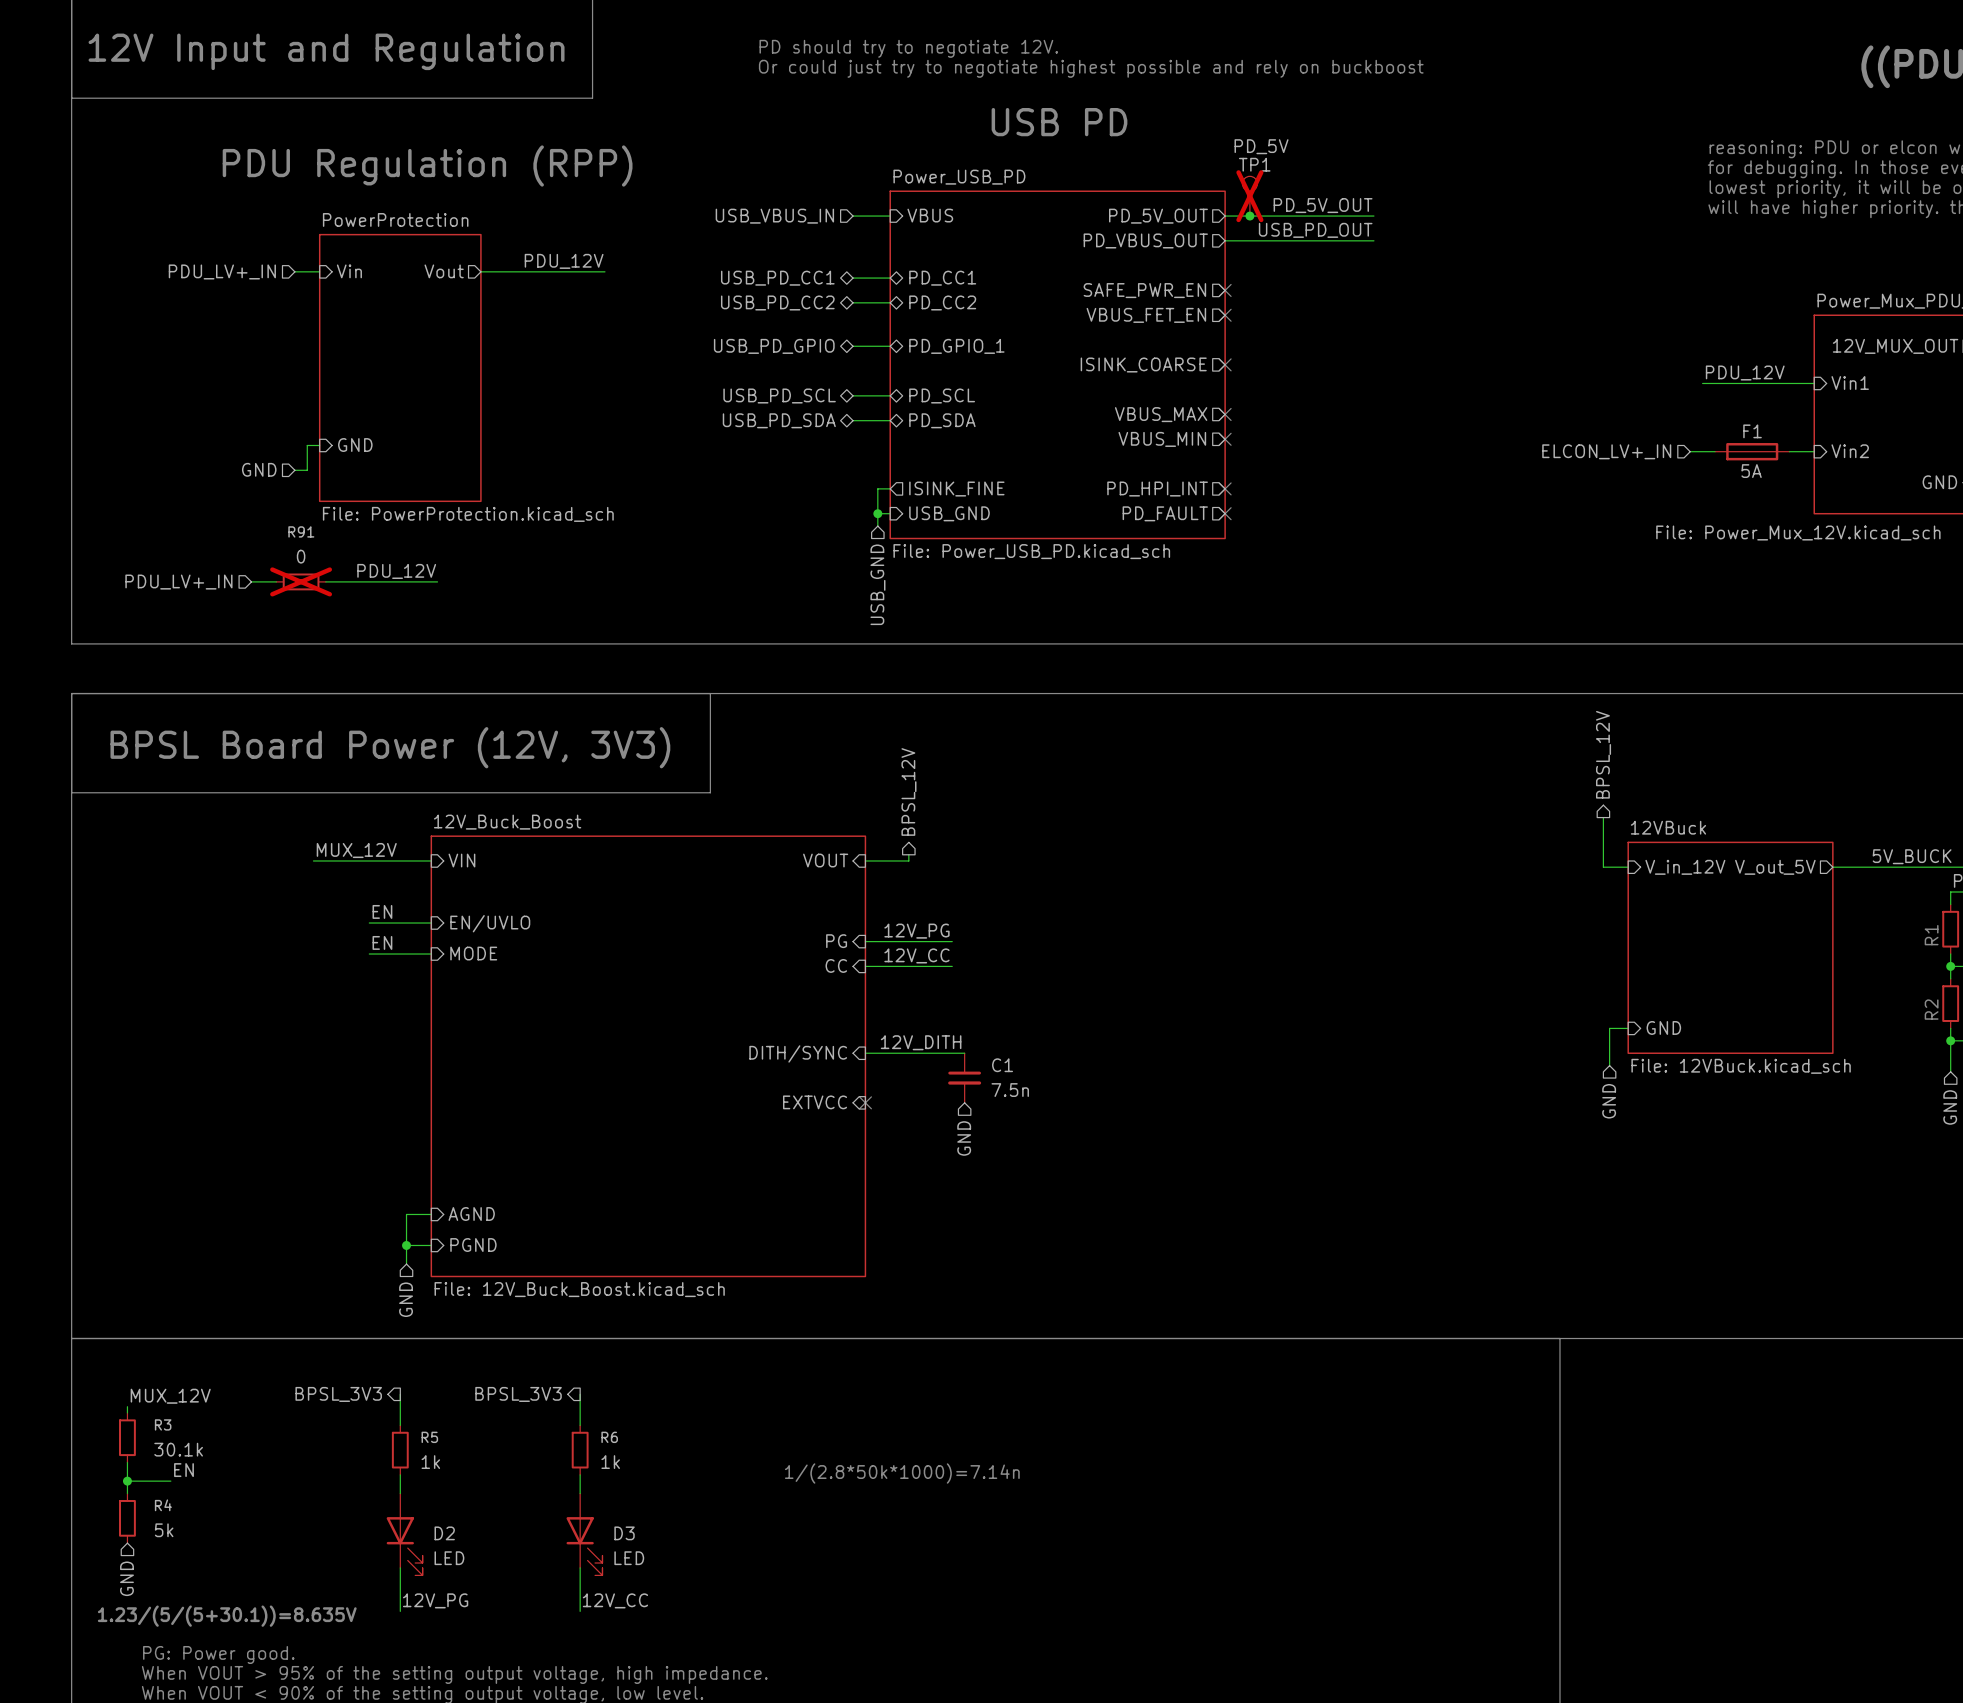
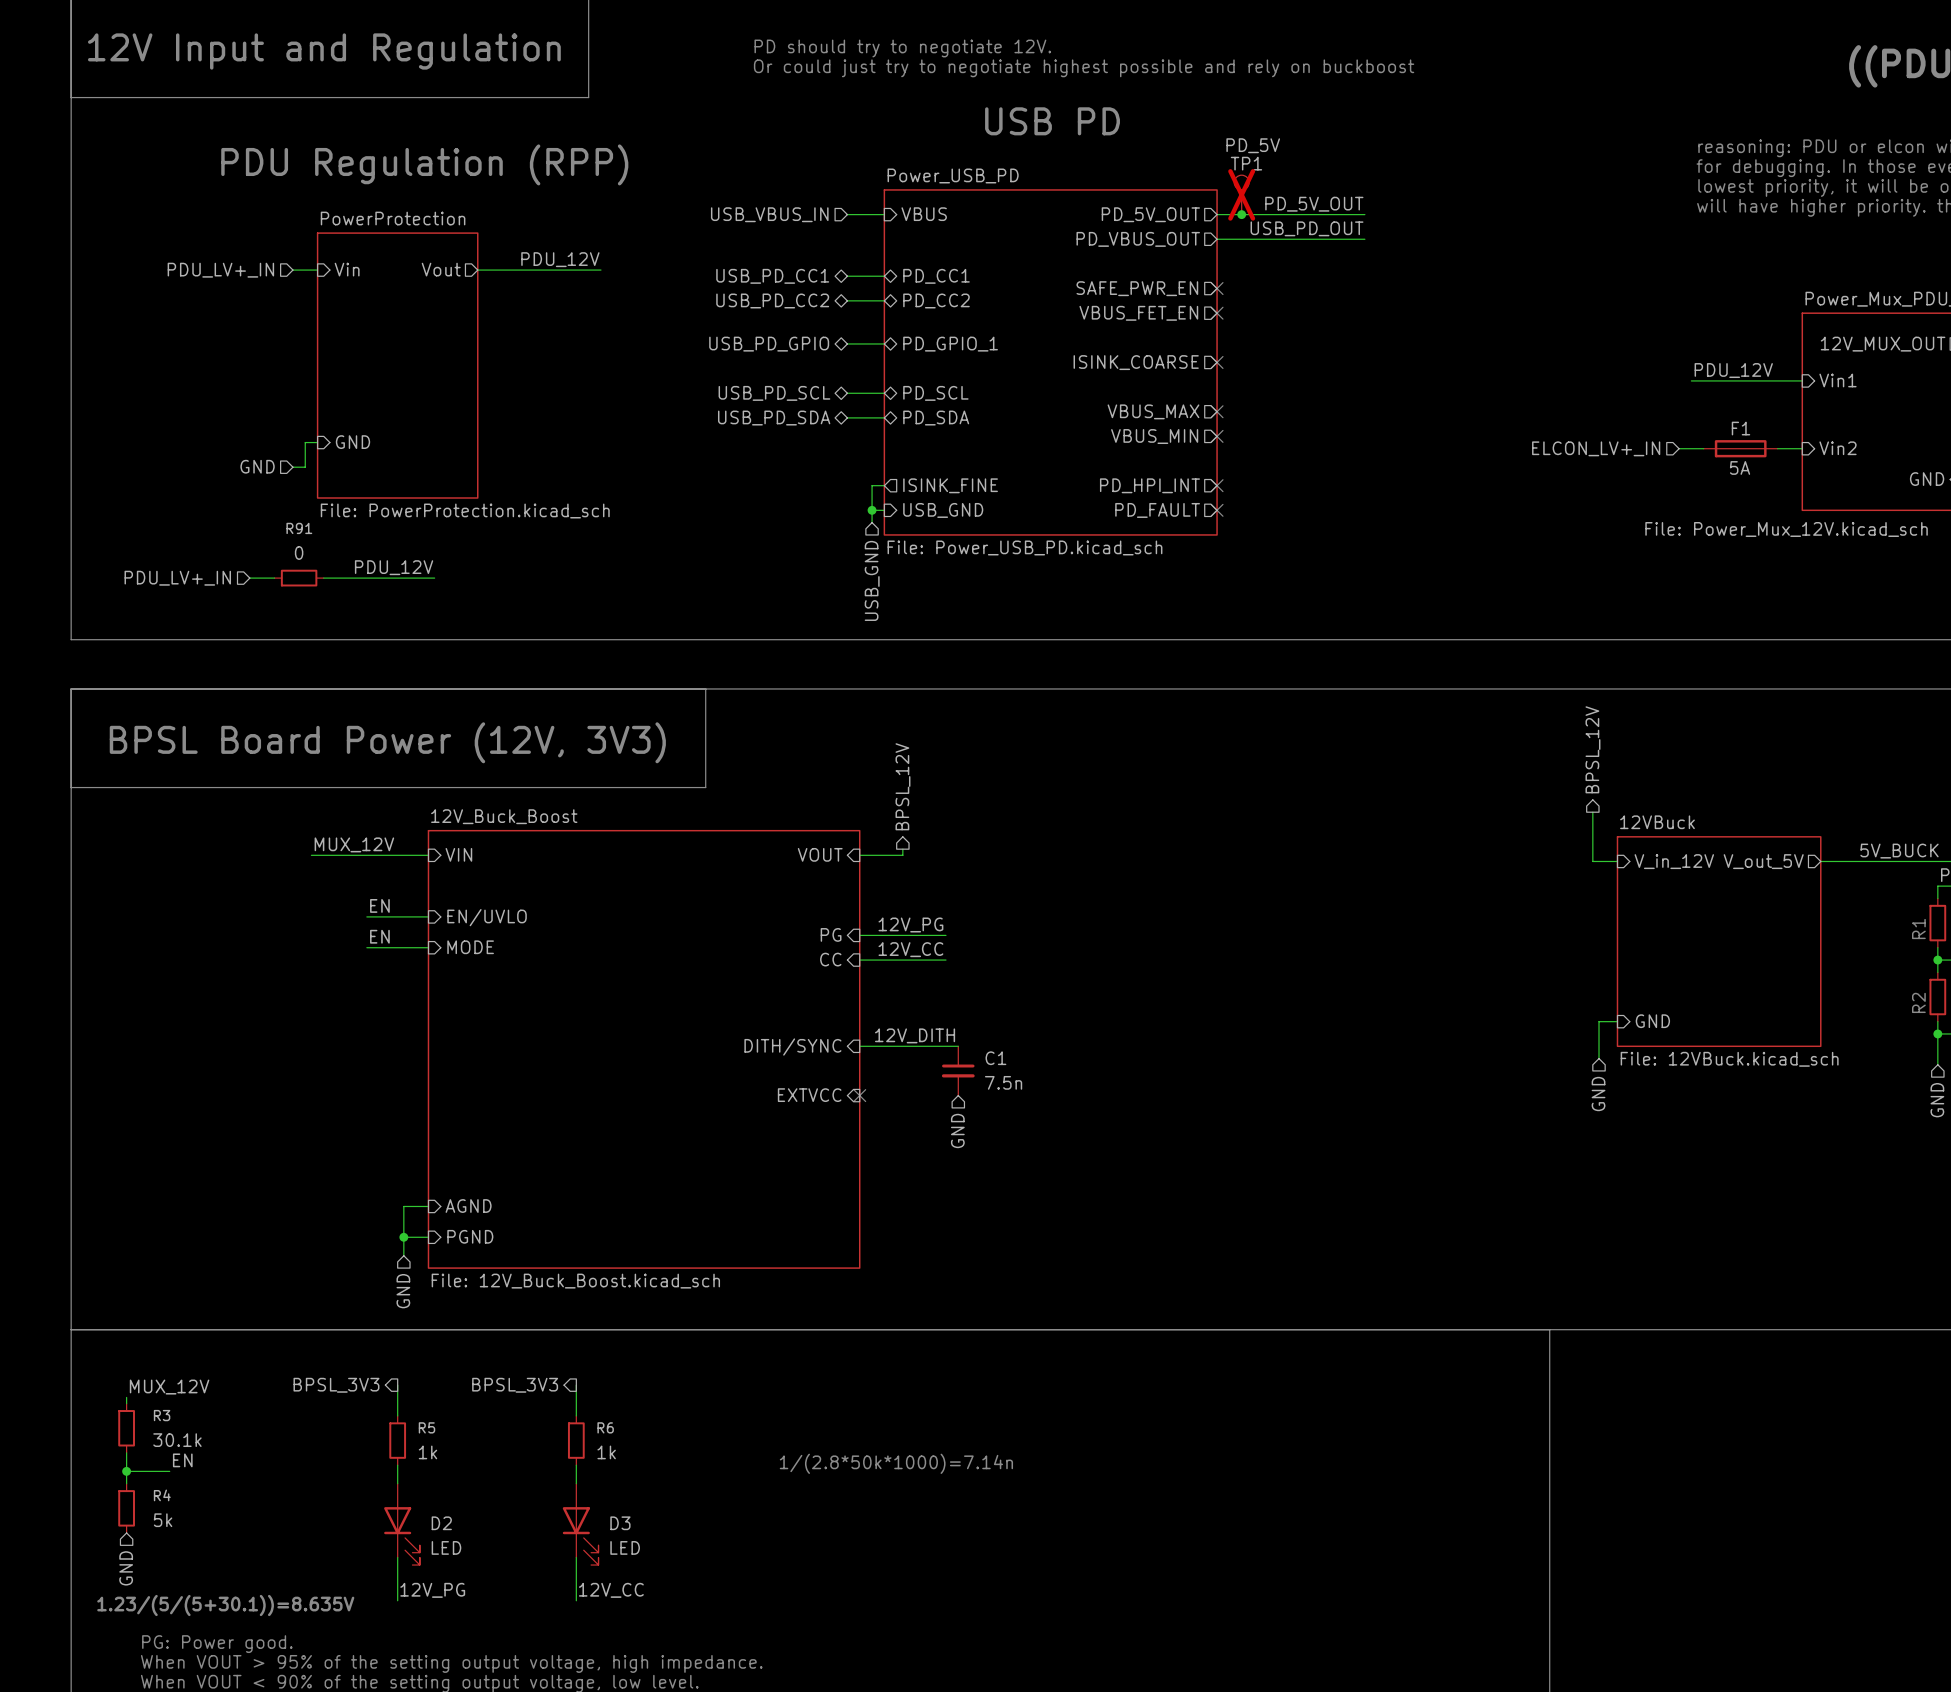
R91 do-not-place cross: (301, 581) -> none

